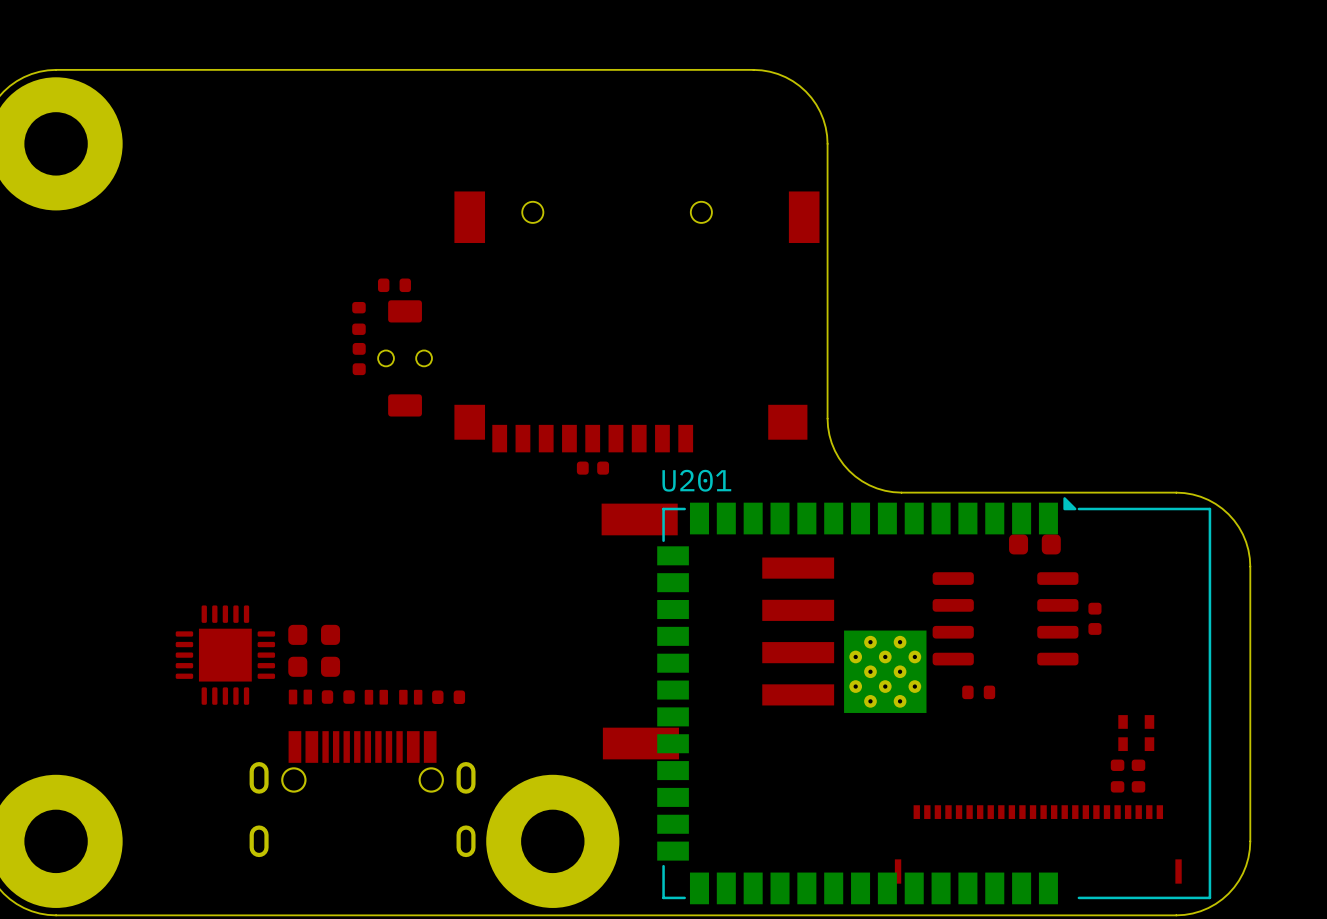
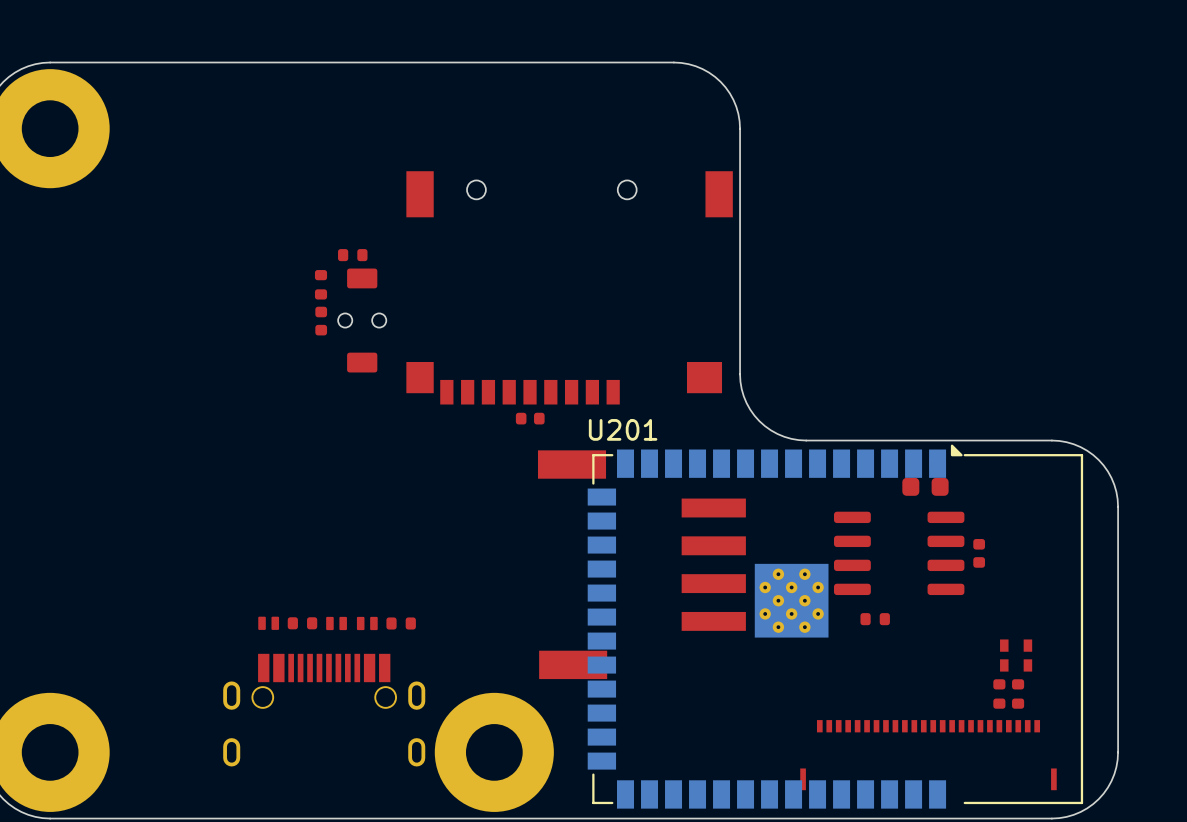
part: (314, 634) -> none
part: (225, 655) -> none
part: (314, 666) -> none

